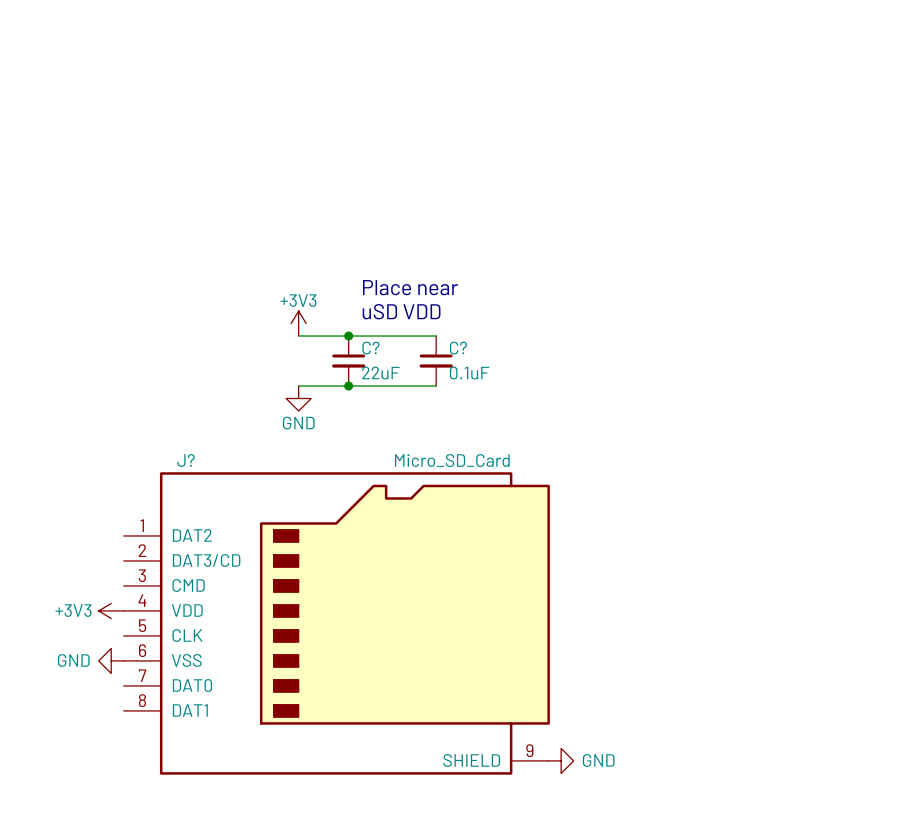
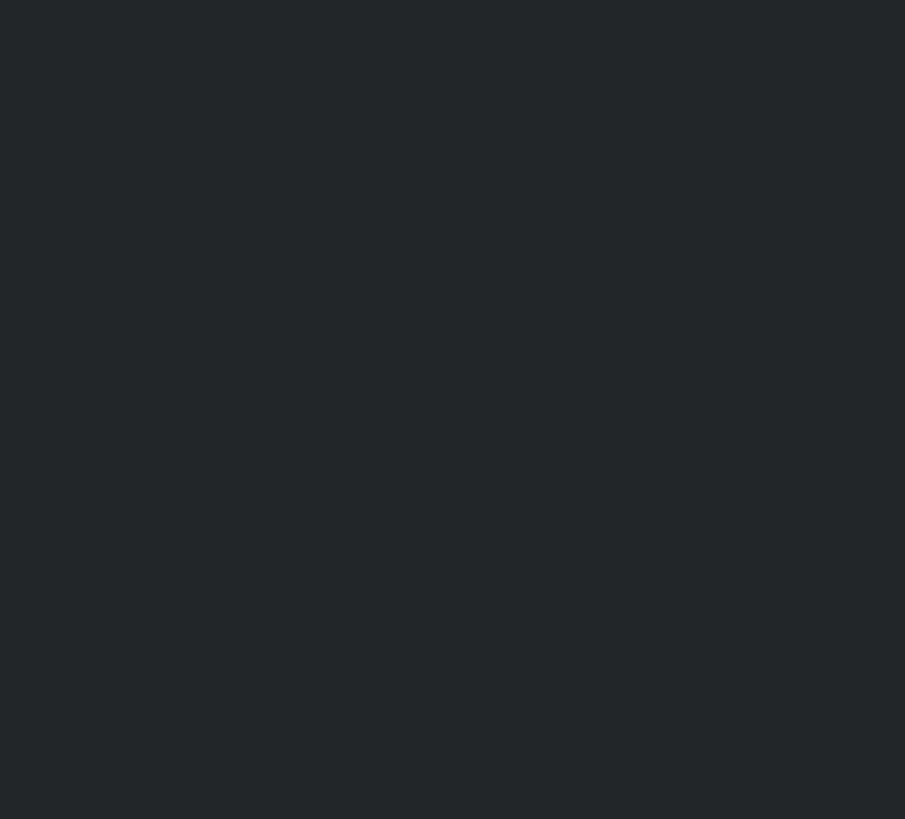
text: Place near (410, 287) -> none
text: uSD VDD (401, 311) -> none
power symbol: +3V3 (298, 323) -> none
wire: (298, 336) (436, 336) -> none
junction: (348, 336) -> none
C?: 22uF (348, 361) -> none
C?: 0.1uF (436, 361) -> none
wire: (298, 386) (436, 386) -> none
junction: (348, 386) -> none
power symbol: GND (298, 398) -> none
power symbol: +3V3 (111, 610) -> none
J?: Micro_SD_Card (336, 623) -> none
power symbol: GND (111, 660) -> none
power symbol: GND (561, 760) -> none

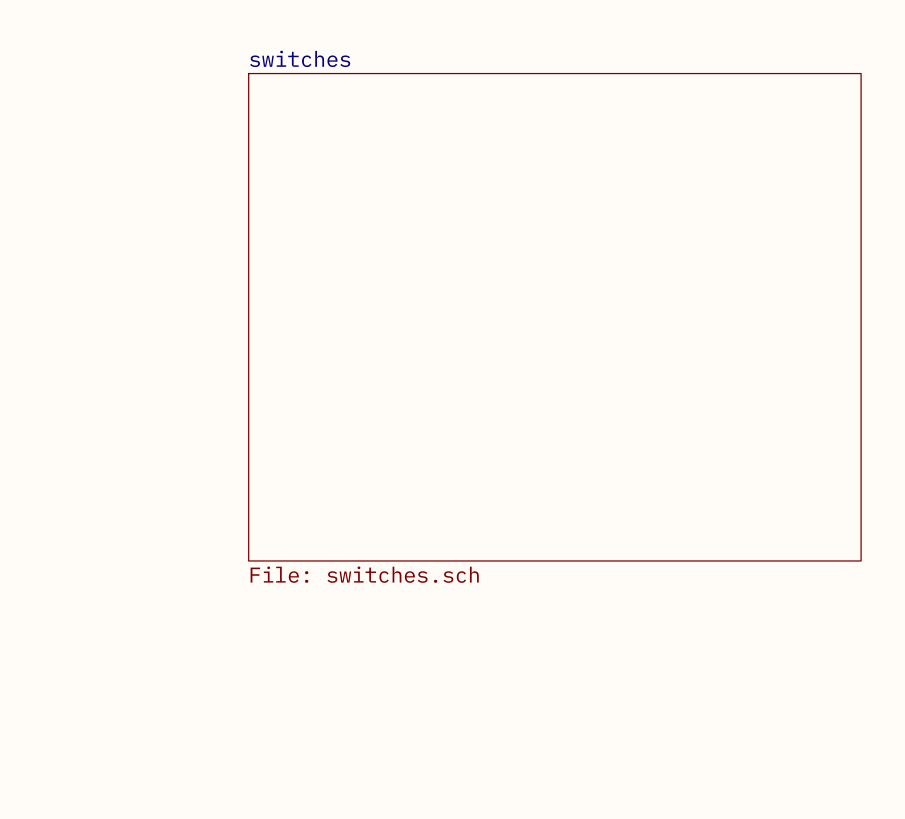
sheet switches: none -> File: switches.sch (554, 317)

